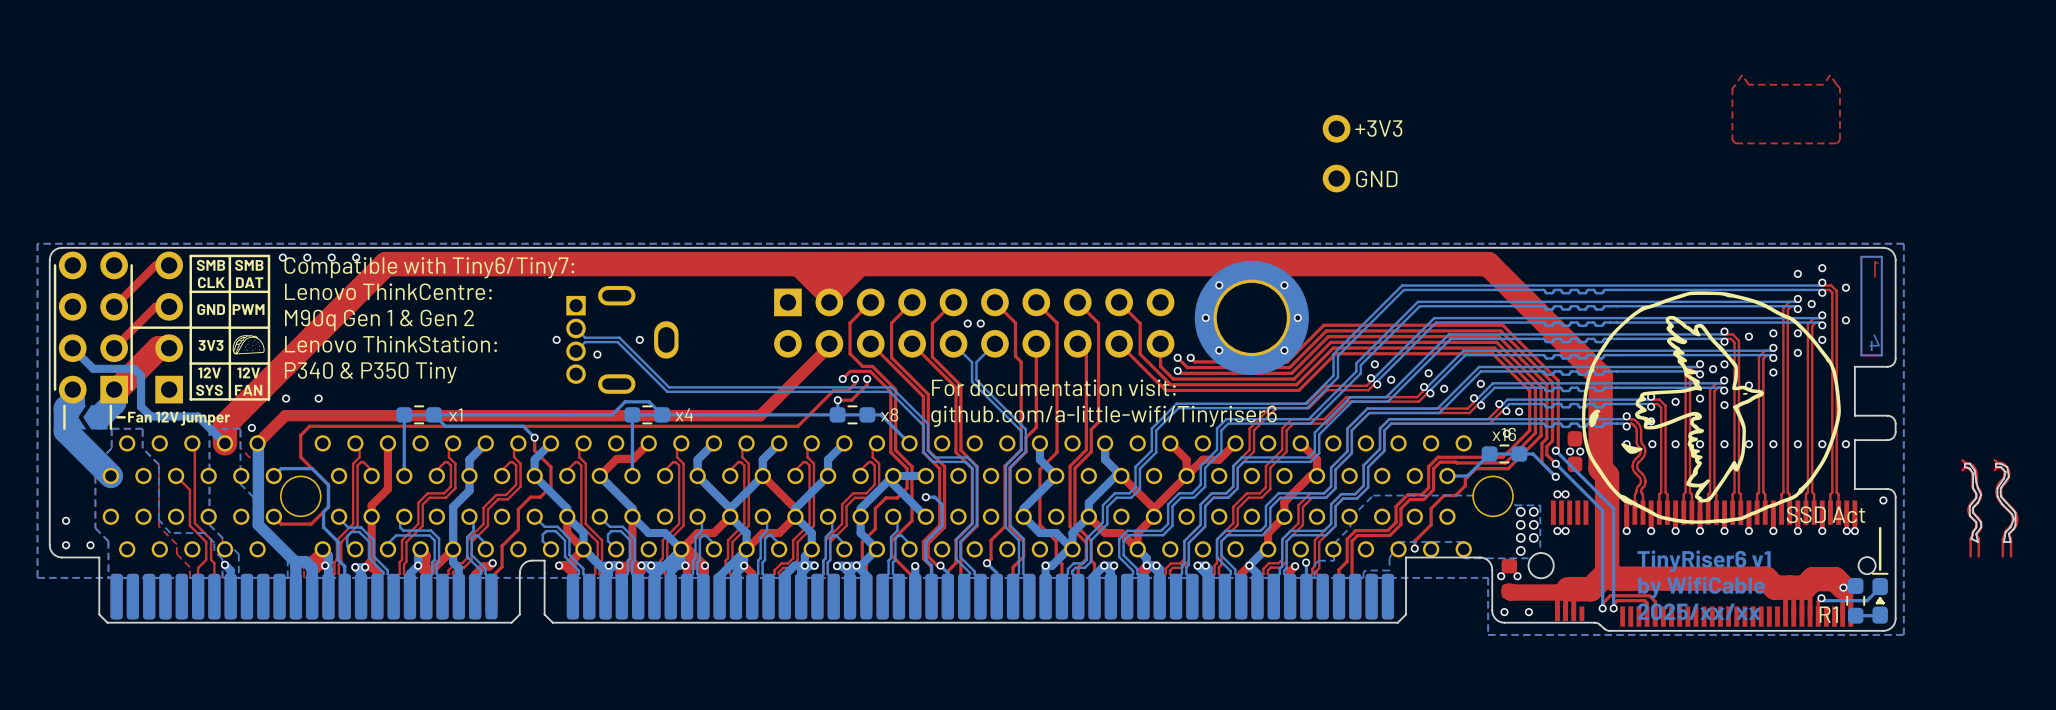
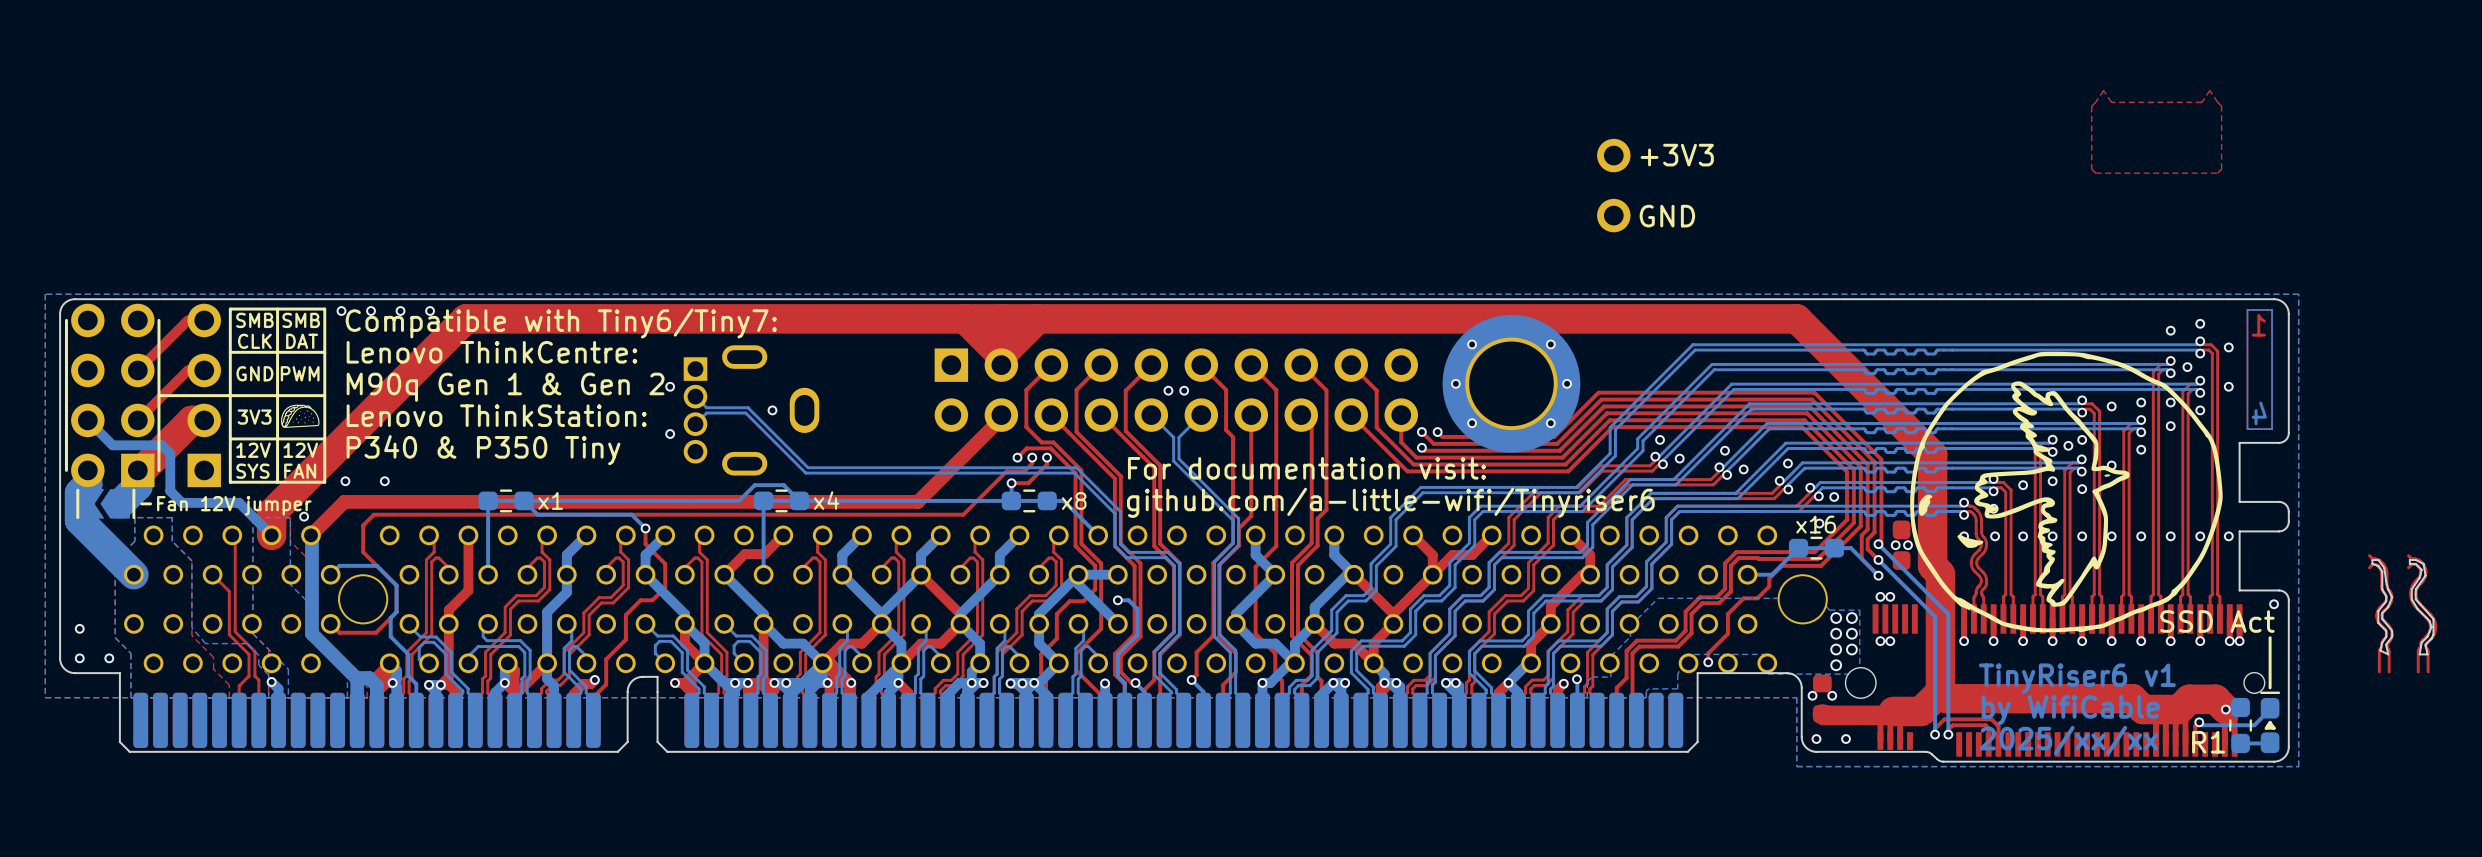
via: none -> (670, 386)
via: (556, 339) -> none
via: (597, 354) -> none
via: none -> (670, 434)

